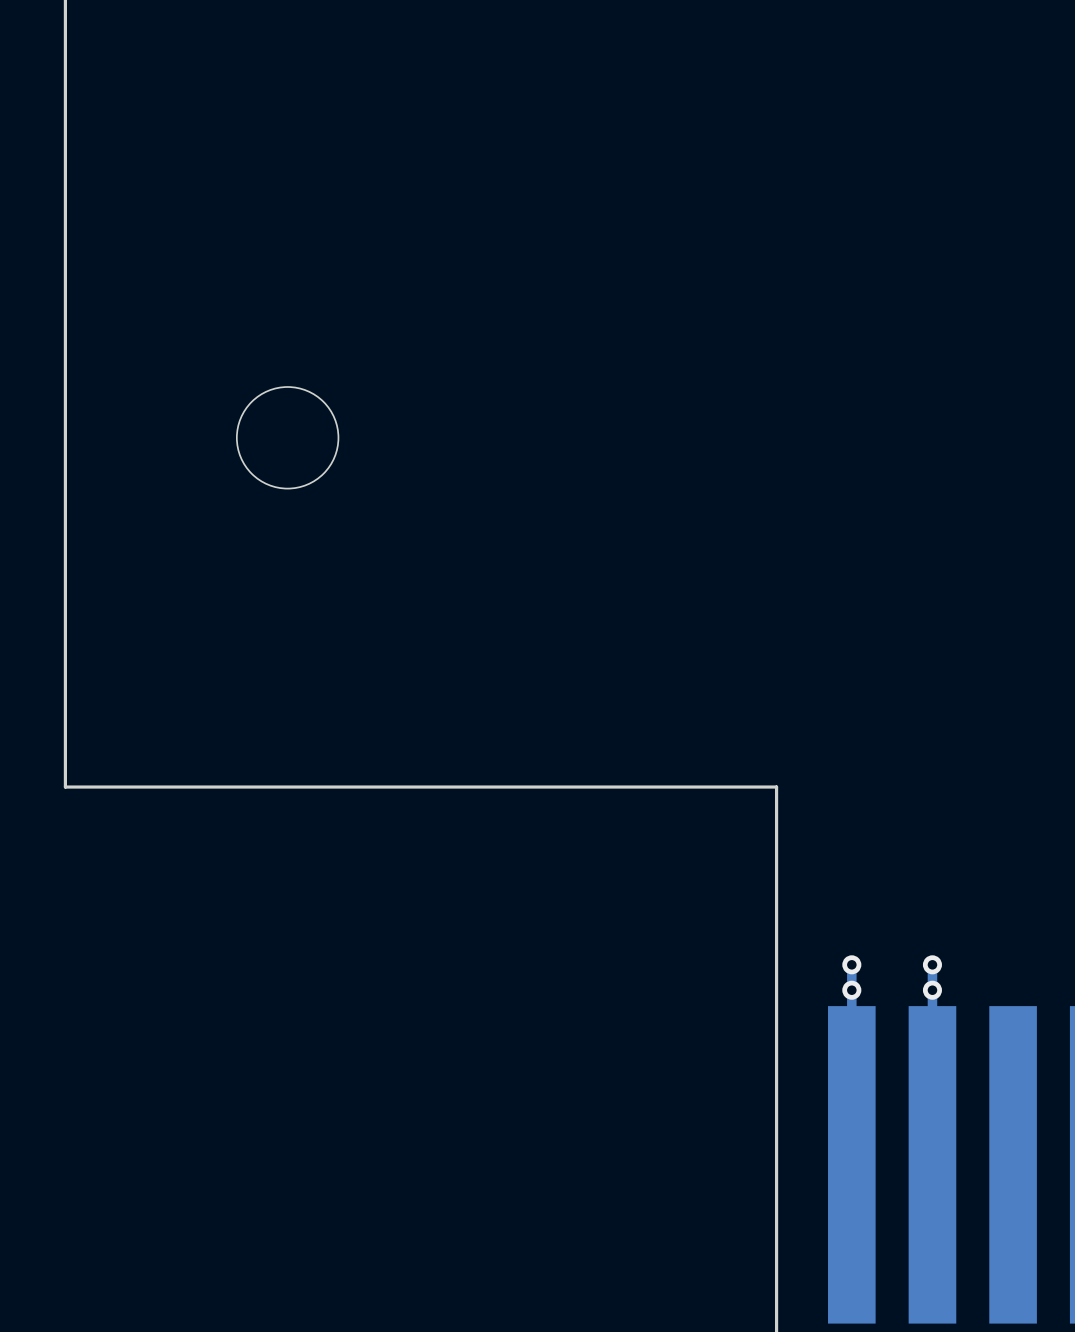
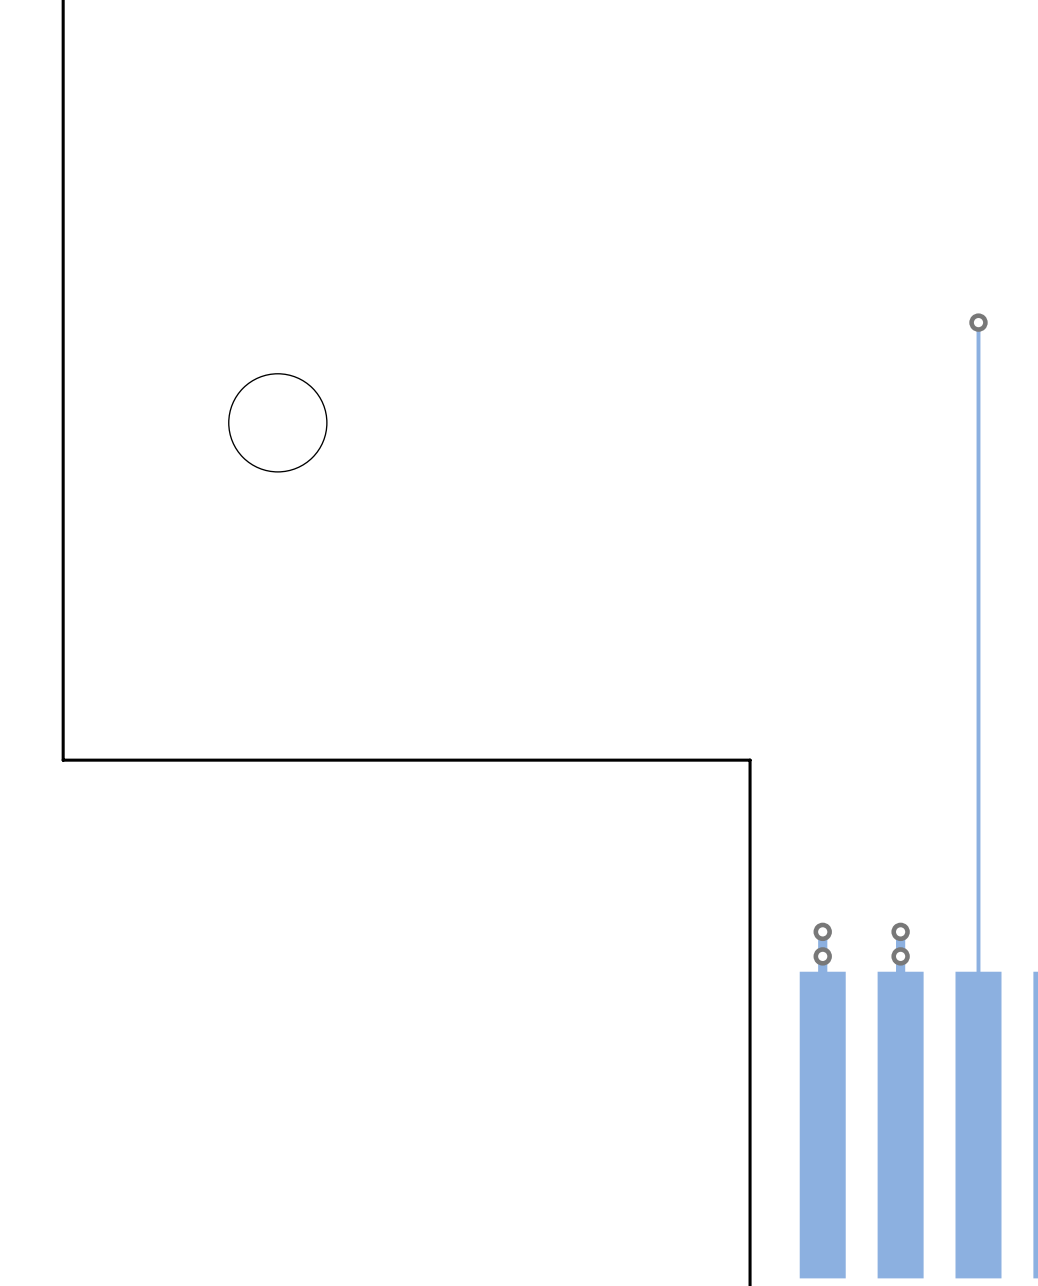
track: none -> (978, 322) (978, 1125)
via: none -> (978, 322)

